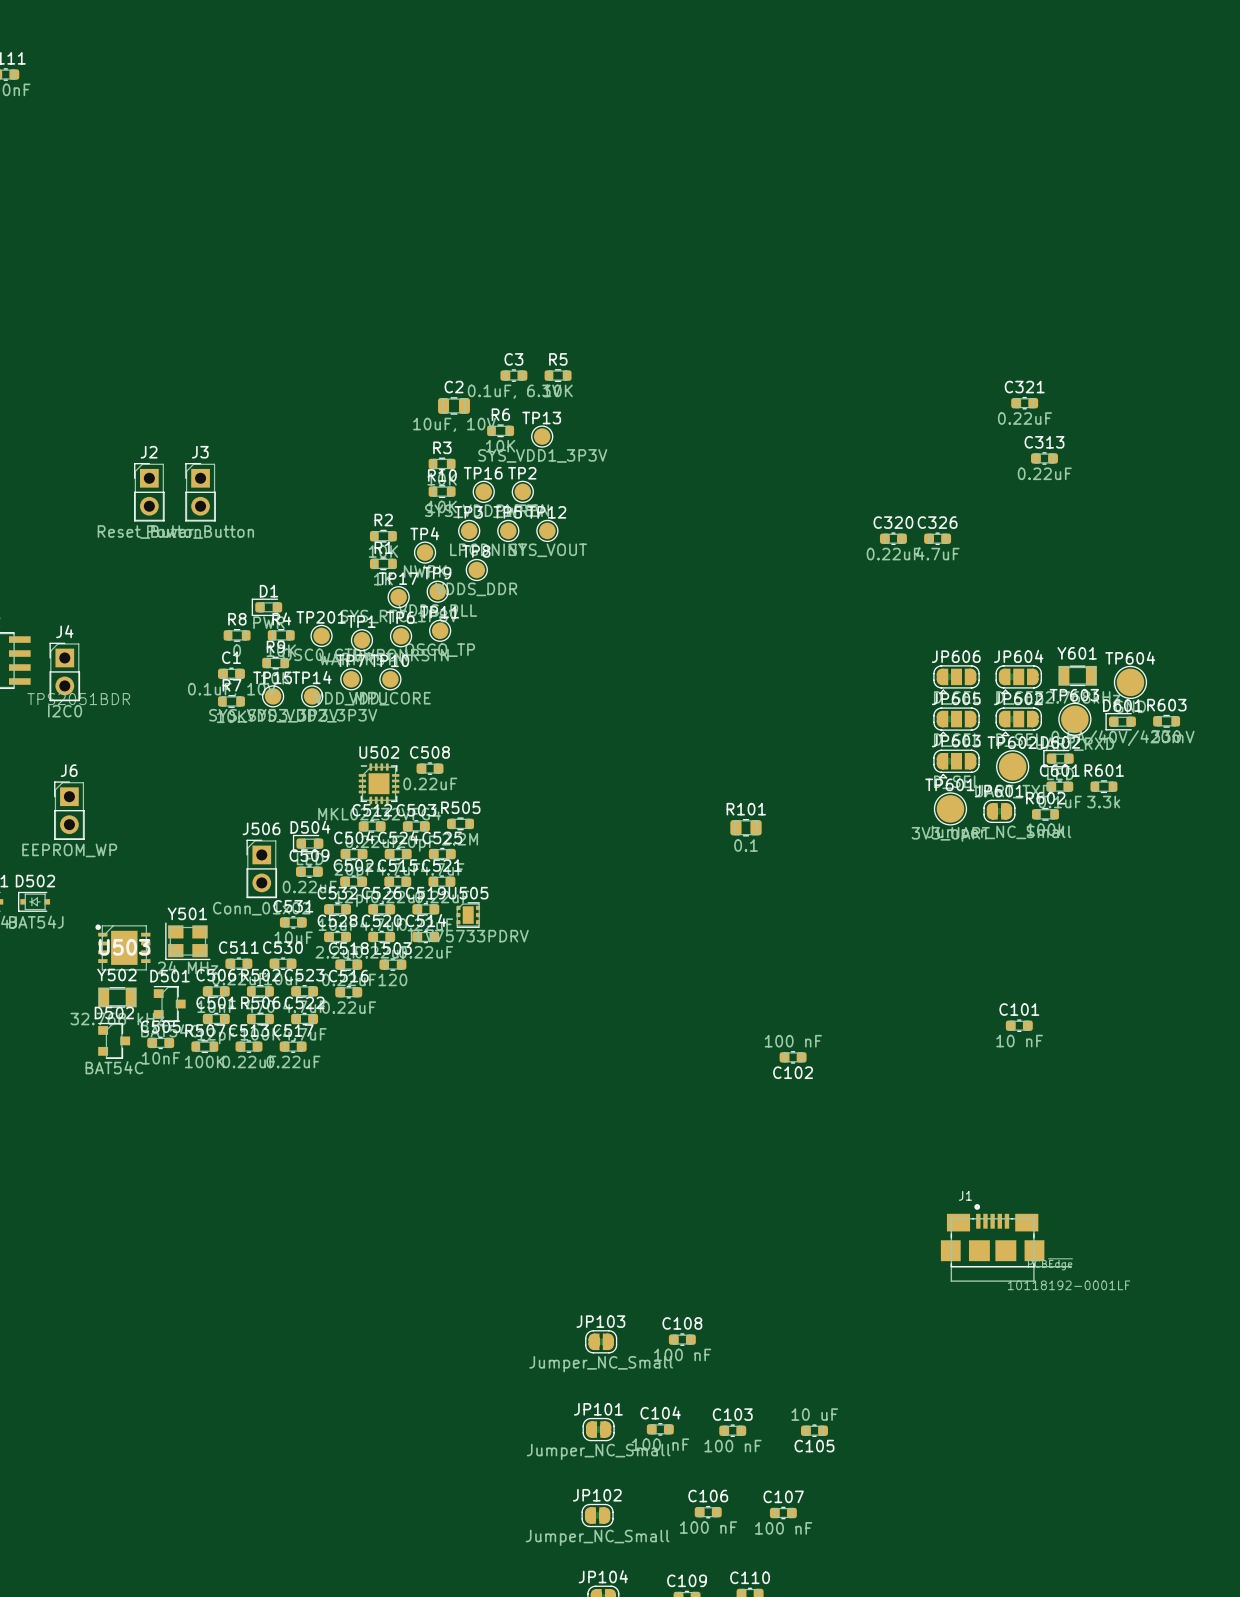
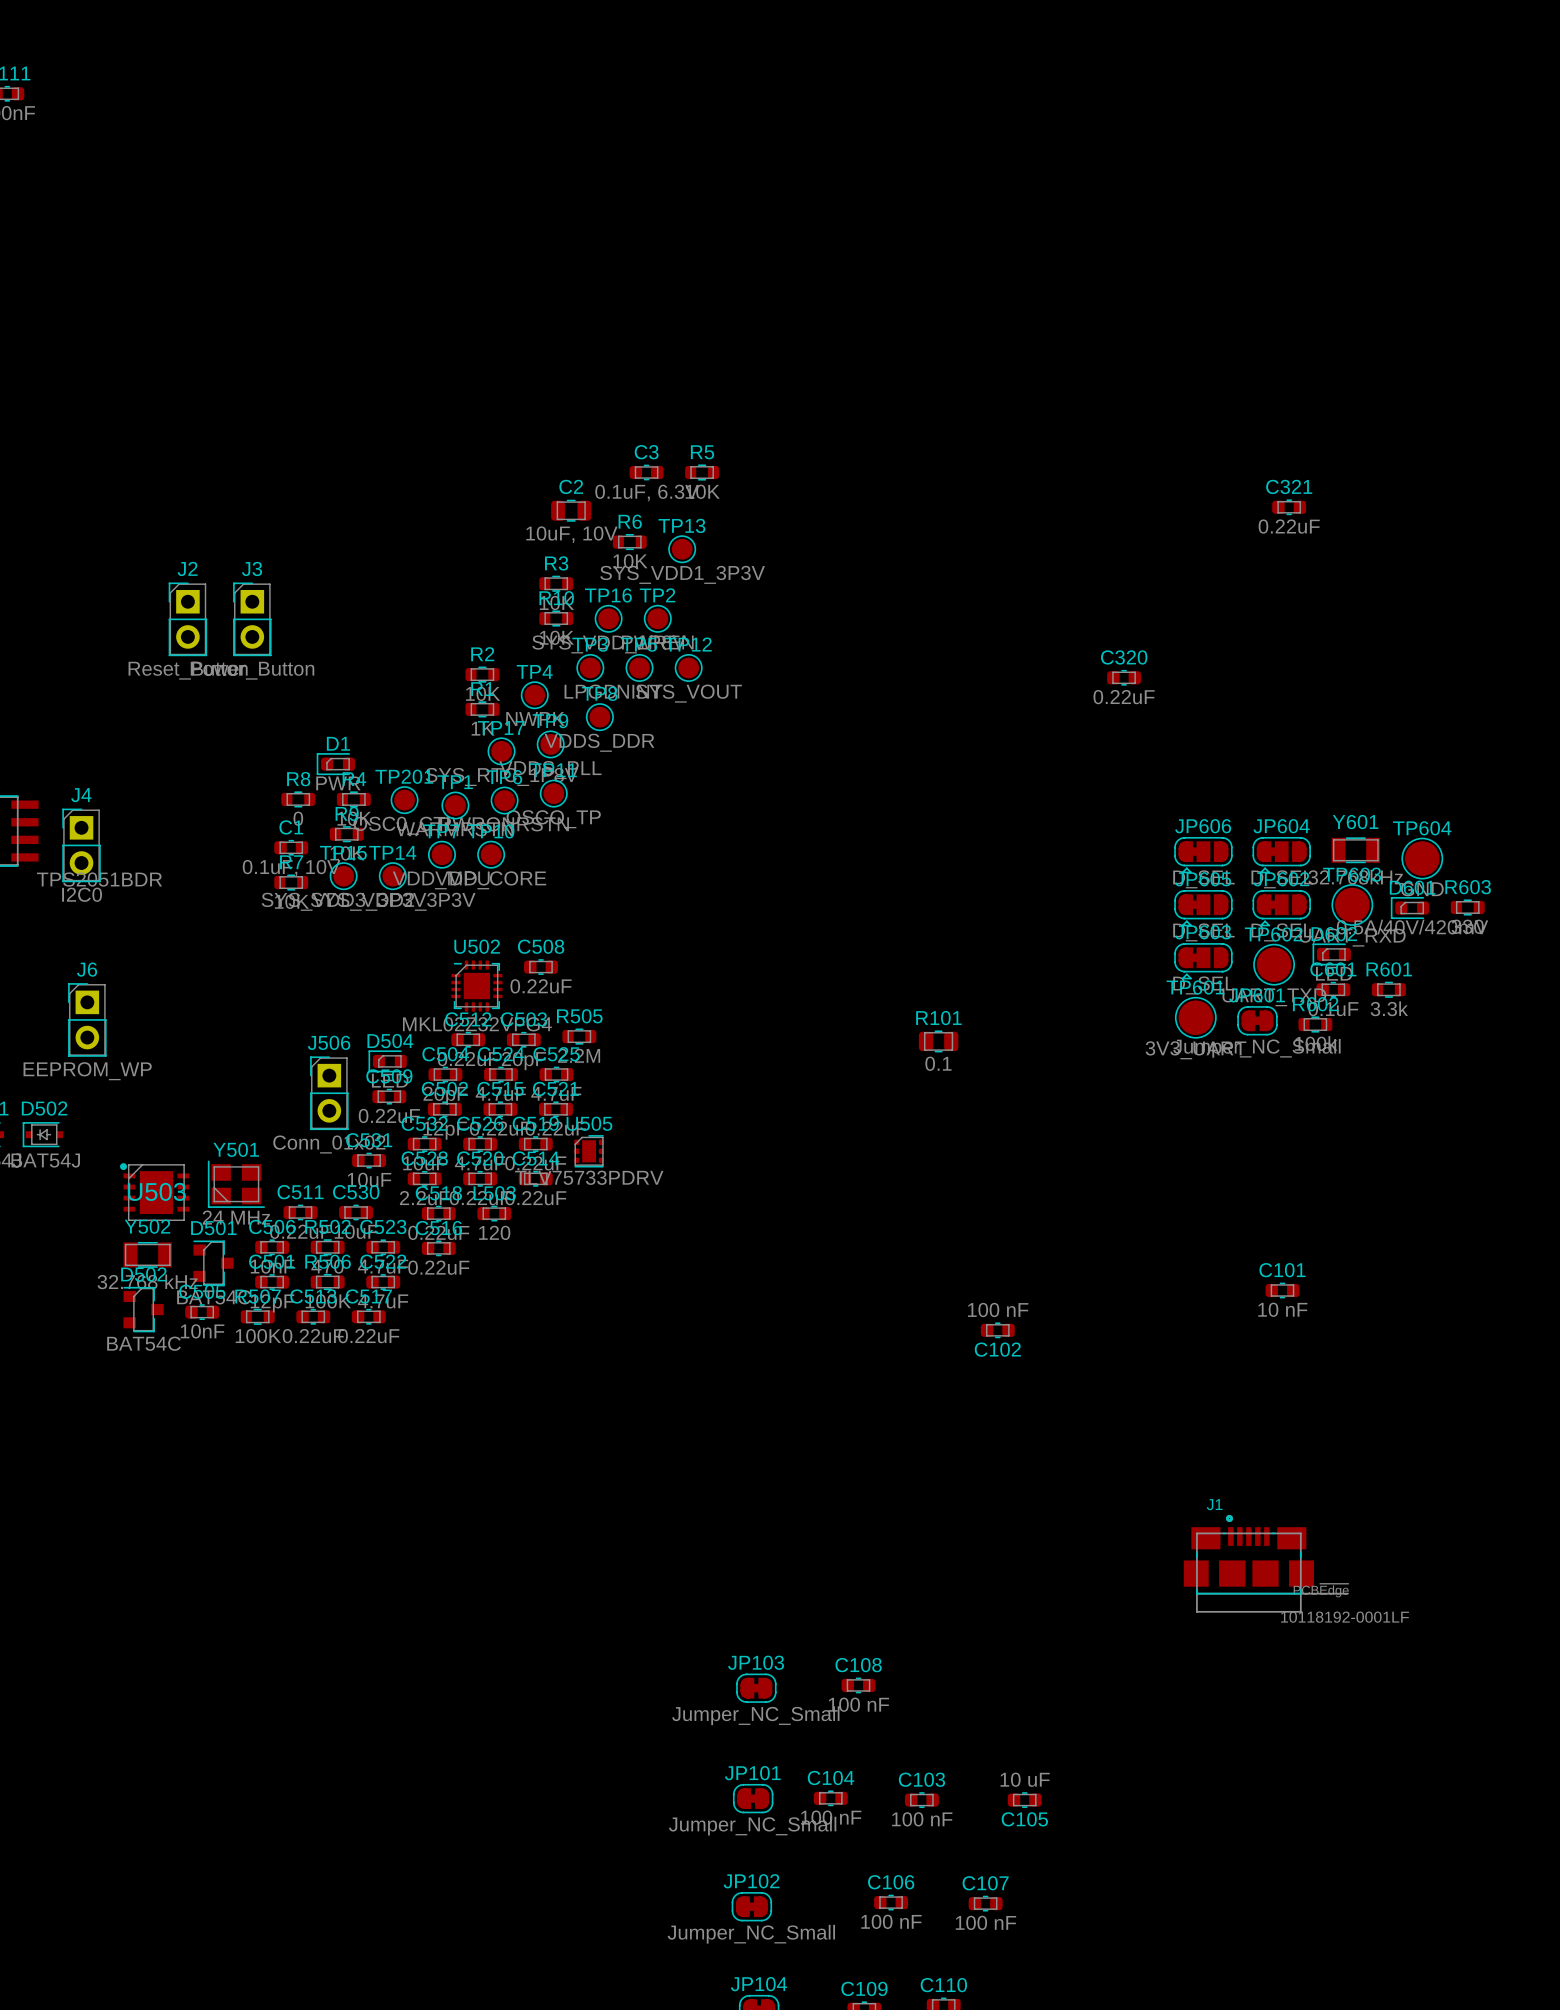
C313: 0.22uF (1044, 458) -> none
C326: 4.7uF (937, 538) -> none

